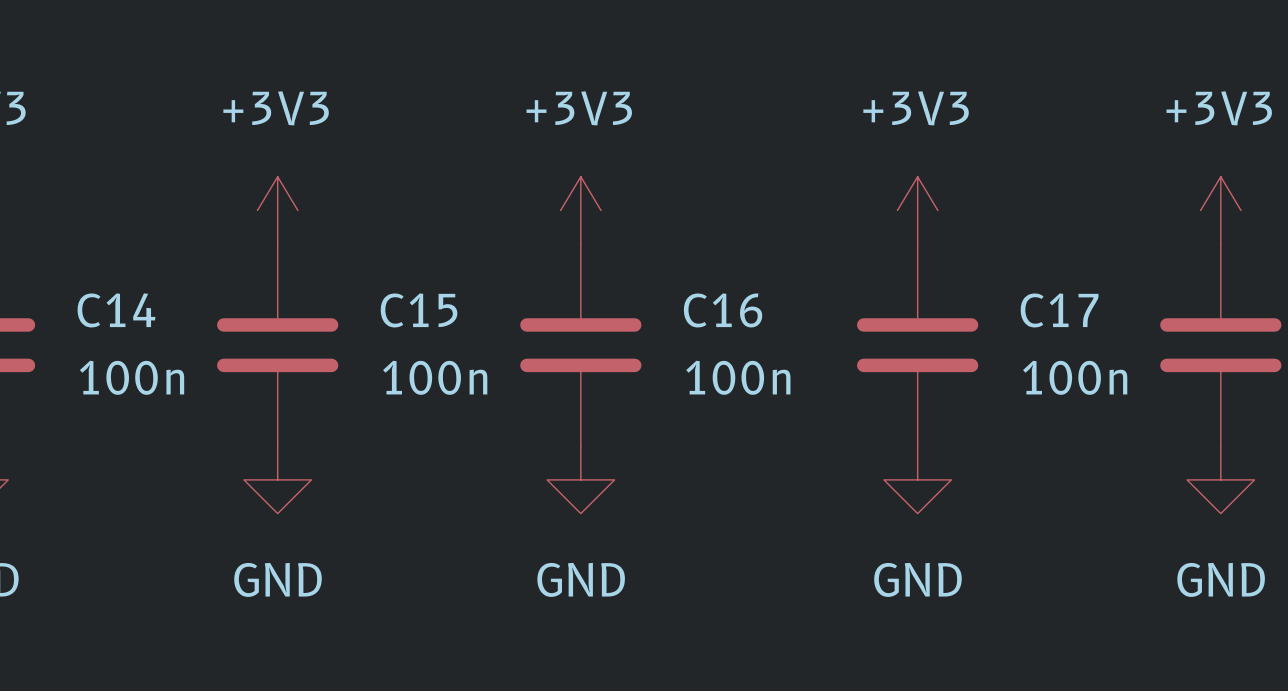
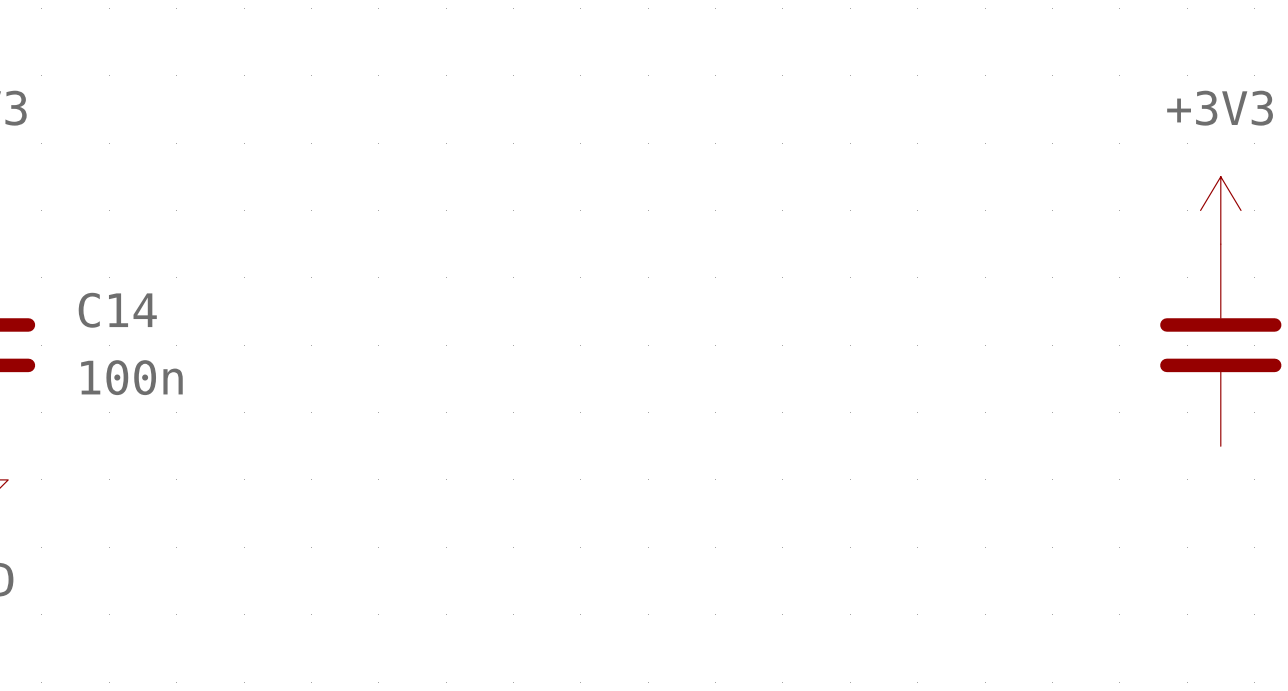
power symbol: +3V3 (277, 210) -> none
power symbol: +3V3 (580, 210) -> none
power symbol: +3V3 (917, 210) -> none
C15: 100n (277, 345) -> none
C16: 100n (580, 345) -> none
C17: 100n (917, 345) -> none
power symbol: GND (277, 479) -> none
power symbol: GND (580, 479) -> none
power symbol: GND (917, 479) -> none
power symbol: GND (1220, 479) -> none

